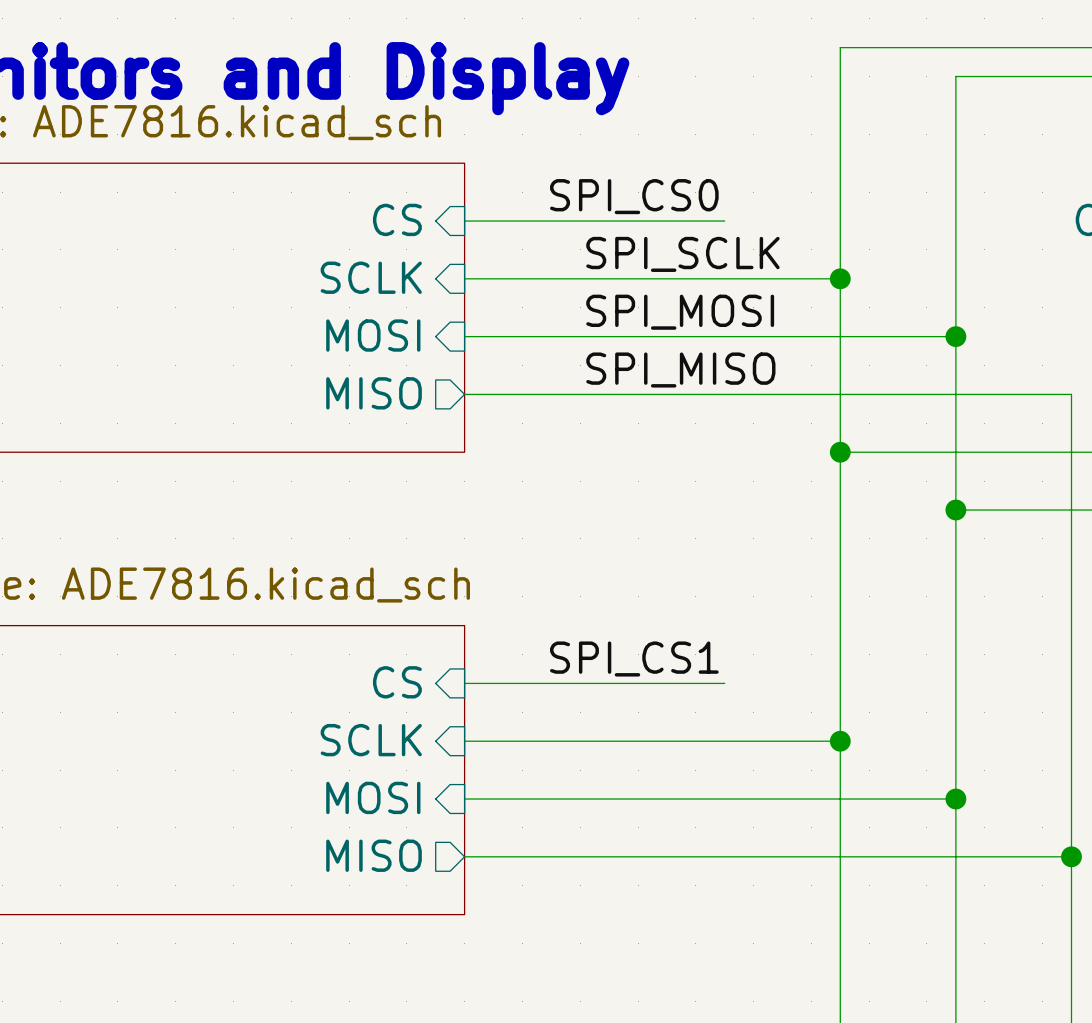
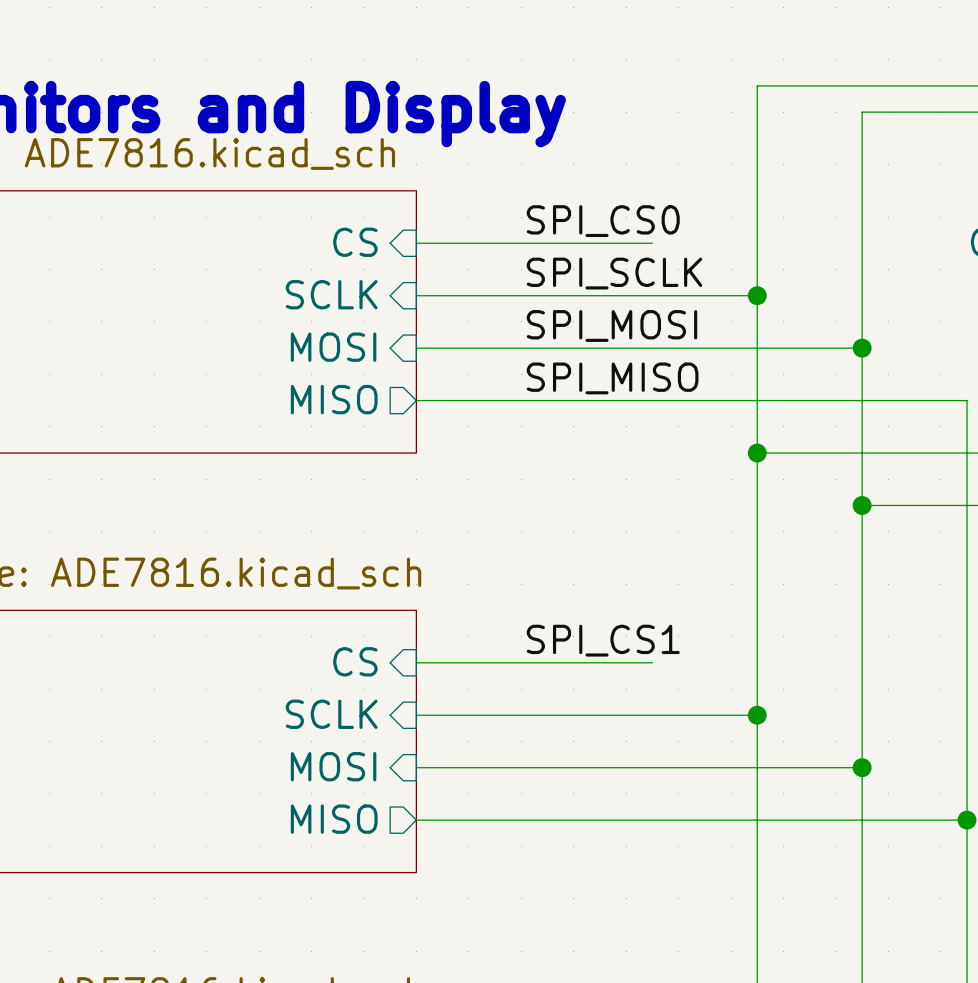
label position: SPI_CS0 (634, 196) -> SPI_CS0 (603, 221)
label position: SPI_CS1 (634, 659) -> SPI_CS1 (603, 640)

